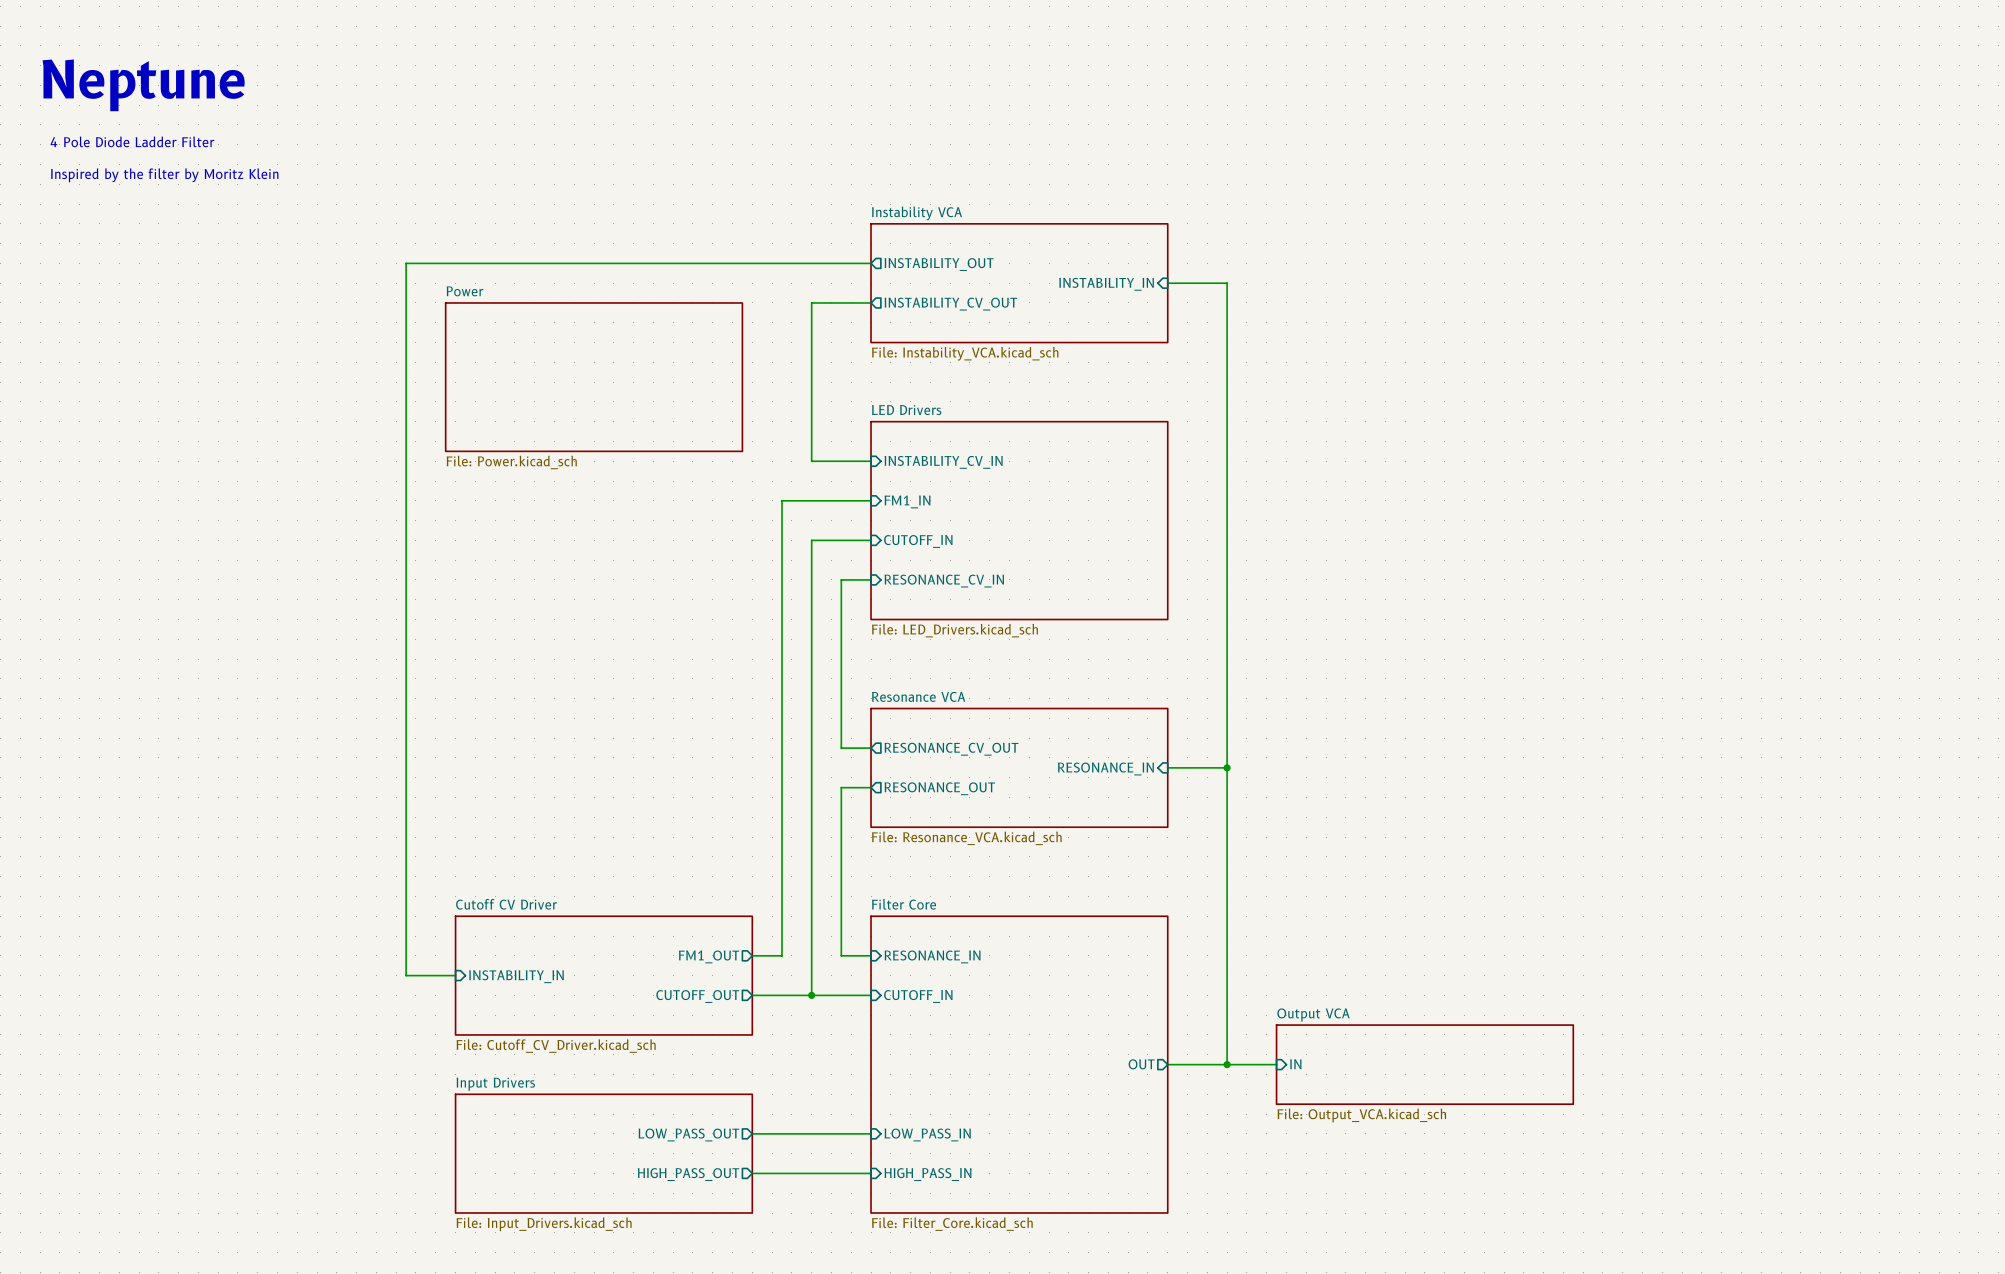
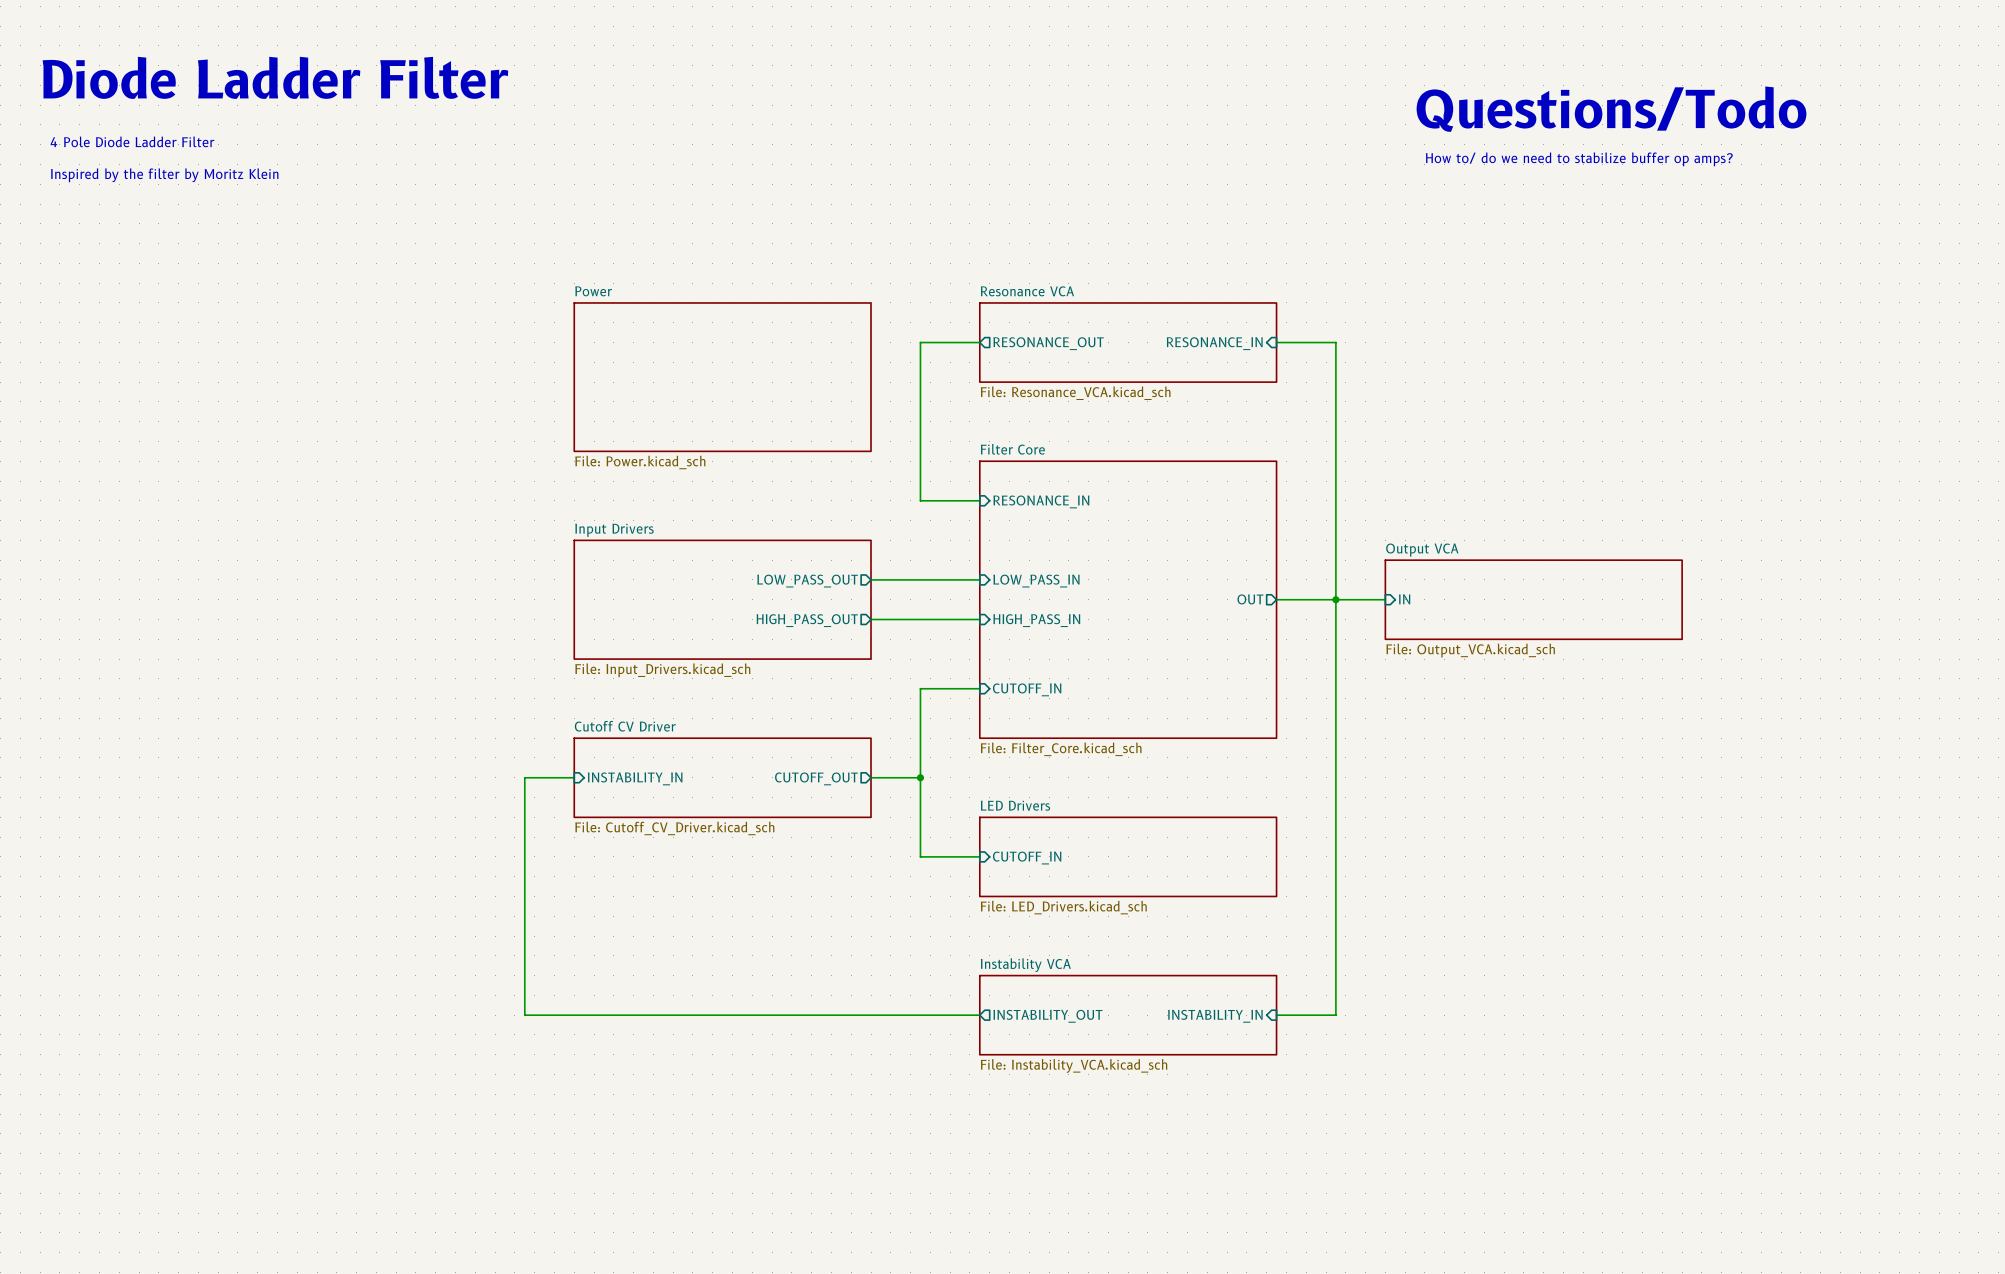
text: Neptune (143, 85) -> Diode Ladder Filter (275, 77)
text: none -> Questions/Todo (1611, 109)
text: none -> How to/ do we need to stabilize buffer op amps? (1579, 159)
wire: (871, 263) (406, 263) (406, 975) (455, 975) -> none
sheet pin: INSTABILITY_OUT (939, 264) -> none
sheet Instability VCA: File: Instability_VCA.kicad_sch (1019, 283) -> none
wire: (1167, 283) (1227, 283) (1227, 1064) -> none
sheet pin: INSTABILITY_IN (1106, 284) -> none
wire: (871, 302) (811, 302) (811, 461) (871, 461) -> (979, 342) (920, 342) (920, 500) (979, 500)
sheet pin: INSTABILITY_CV_OUT (950, 304) -> none
sheet Resonance VCA: none -> File: Resonance_VCA.kicad_sch (1128, 342)
wire: none -> (1276, 342) (1335, 342) (1335, 1015) (1276, 1015)
sheet pin: none -> RESONANCE_OUT (1048, 343)
sheet pin: none -> RESONANCE_IN (1214, 343)
sheet Power position: (594, 377) -> (722, 377)
sheet pin: INSTABILITY_CV_IN (943, 462) -> none
wire: (871, 500) (781, 500) (781, 955) (752, 955) -> none
sheet pin: FM1_IN (907, 501) -> none
sheet pin: none -> RESONANCE_IN (1041, 501)
sheet LED Drivers: File: LED_Drivers.kicad_sch (1019, 520) -> none
wire: (871, 540) (811, 540) (811, 995) -> none
sheet pin: CUTOFF_IN (918, 541) -> none
wire: (871, 579) (841, 579) (841, 748) (871, 748) -> (871, 579) (979, 579)
sheet pin: none -> LOW_PASS_OUT (807, 581)
sheet pin: RESONANCE_CV_IN (944, 581) -> none
sheet pin: none -> LOW_PASS_IN (1036, 581)
sheet Input Drivers: none -> File: Input_Drivers.kicad_sch (722, 599)
sheet Filter Core: none -> File: Filter_Core.kicad_sch (1128, 599)
sheet pin: none -> OUT (1250, 599)
wire: none -> (1276, 599) (1385, 599)
junction: none -> (1335, 599)
sheet pin: none -> IN (1404, 599)
sheet Output VCA: none -> File: Output_VCA.kicad_sch (1533, 599)
sheet pin: none -> HIGH_PASS_OUT (807, 620)
sheet pin: none -> HIGH_PASS_IN (1036, 620)
wire: none -> (979, 688) (920, 688) (920, 856) (979, 856)
sheet pin: none -> CUTOFF_IN (1027, 689)
sheet pin: RESONANCE_CV_OUT (951, 749) -> none
sheet Resonance VCA: File: Resonance_VCA.kicad_sch (1019, 767) -> none
wire: (1167, 767) (1227, 767) -> none
junction: (1227, 767) -> none
sheet pin: RESONANCE_IN (1105, 768) -> none
wire: none -> (574, 777) (524, 777) (524, 1015) (979, 1015)
sheet Cutoff CV Driver: none -> File: Cutoff_CV_Driver.kicad_sch (722, 777)
wire: none -> (871, 777) (920, 777)
junction: none -> (920, 777)
sheet pin: none -> INSTABILITY_IN (635, 778)
sheet pin: none -> CUTOFF_OUT (816, 778)
wire: (871, 787) (841, 787) (841, 955) (871, 955) -> none
sheet pin: RESONANCE_OUT (939, 788) -> none
sheet LED Drivers: none -> File: LED_Drivers.kicad_sch (1128, 856)
sheet pin: none -> CUTOFF_IN (1027, 858)
sheet pin: FM1_OUT (709, 956) -> none
sheet pin: RESONANCE_IN (932, 956) -> none
sheet Cutoff CV Driver: File: Cutoff_CV_Driver.kicad_sch (603, 975) -> none
sheet pin: INSTABILITY_IN (516, 976) -> none
wire: (752, 995) (871, 995) -> none
junction: (811, 995) -> none
sheet pin: CUTOFF_OUT (697, 996) -> none
sheet pin: CUTOFF_IN (918, 996) -> none
sheet Instability VCA: none -> File: Instability_VCA.kicad_sch (1128, 1015)
sheet pin: none -> INSTABILITY_OUT (1047, 1016)
sheet pin: none -> INSTABILITY_IN (1215, 1016)
sheet Filter Core: File: Filter_Core.kicad_sch (1019, 1064) -> none
sheet pin: OUT (1141, 1064) -> none
wire: (1167, 1064) (1276, 1064) -> none
junction: (1227, 1064) -> none
sheet pin: IN (1295, 1064) -> none
sheet Output VCA: File: Output_VCA.kicad_sch (1424, 1064) -> none
wire: (752, 1133) (871, 1133) -> none
sheet pin: LOW_PASS_OUT (688, 1134) -> none
sheet pin: LOW_PASS_IN (927, 1134) -> none
sheet Input Drivers: File: Input_Drivers.kicad_sch (603, 1153) -> none
wire: (752, 1173) (871, 1173) -> none
sheet pin: HIGH_PASS_OUT (688, 1174) -> none
sheet pin: HIGH_PASS_IN (927, 1174) -> none

